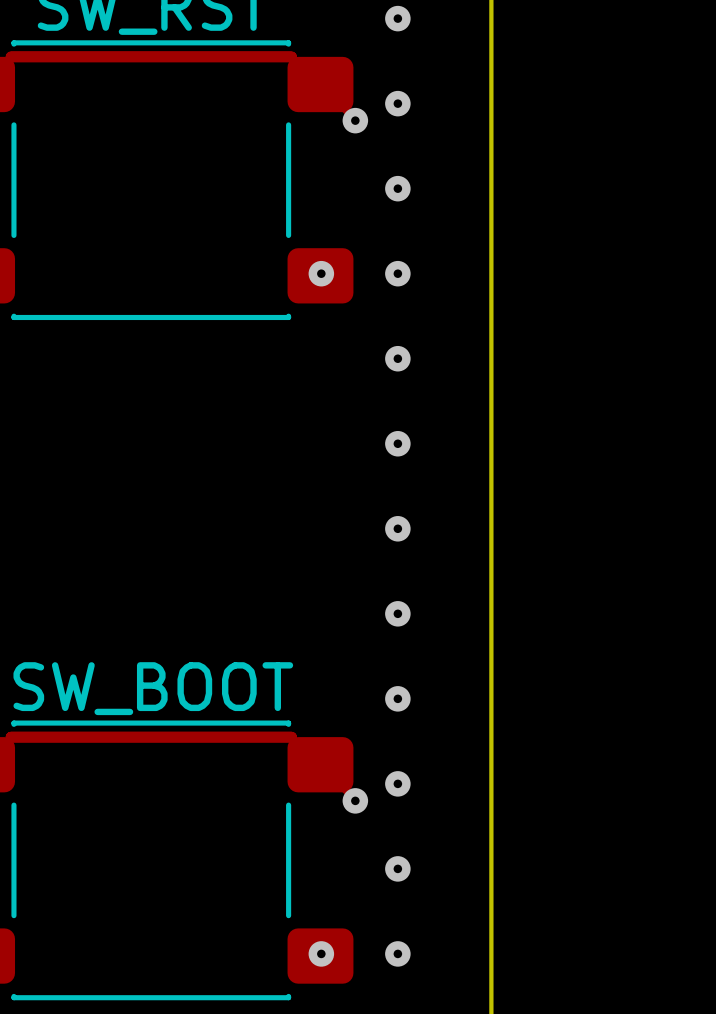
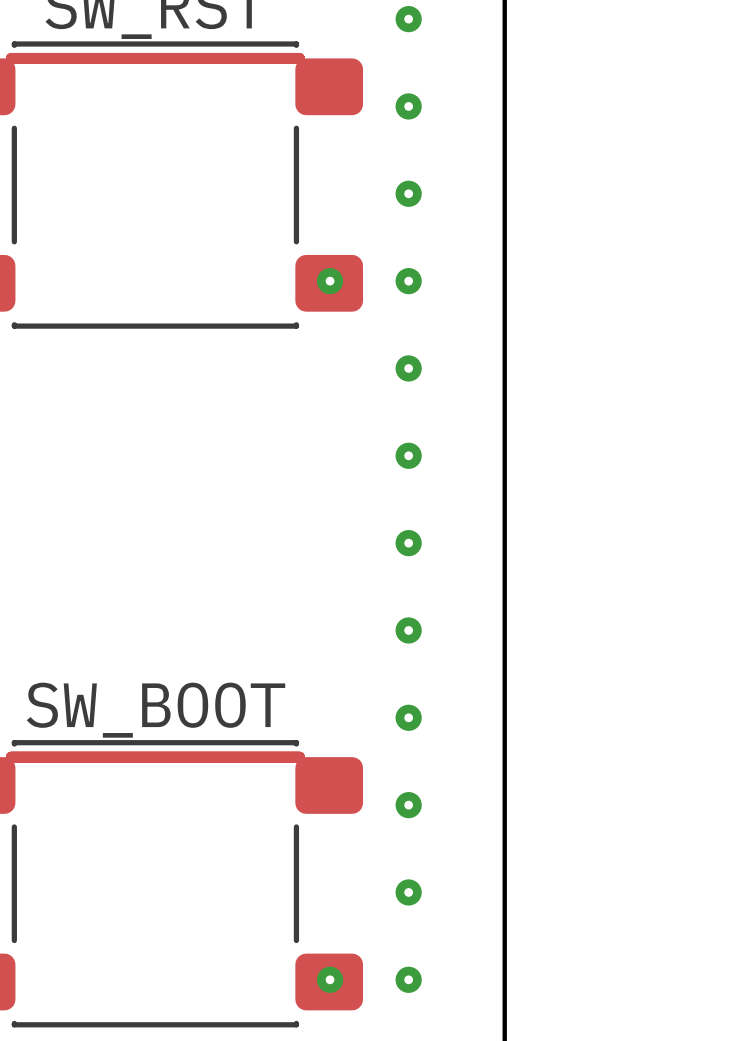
via: (355, 120) -> none
via: (355, 800) -> none

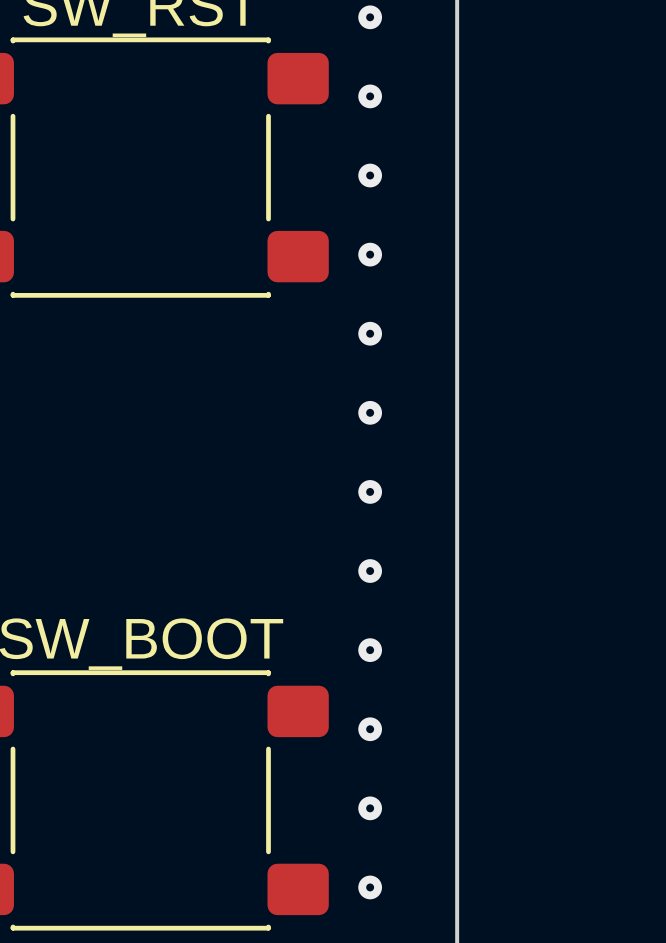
top track: (11, 58) (299, 58) -> none
via: (330, 281) -> none
top track: (11, 757) (299, 757) -> none
via: (330, 979) -> none

